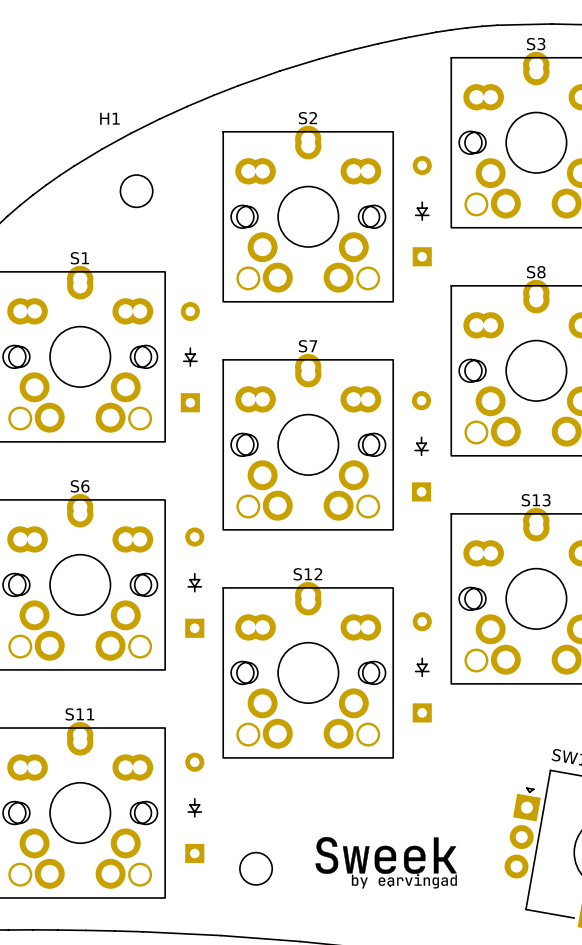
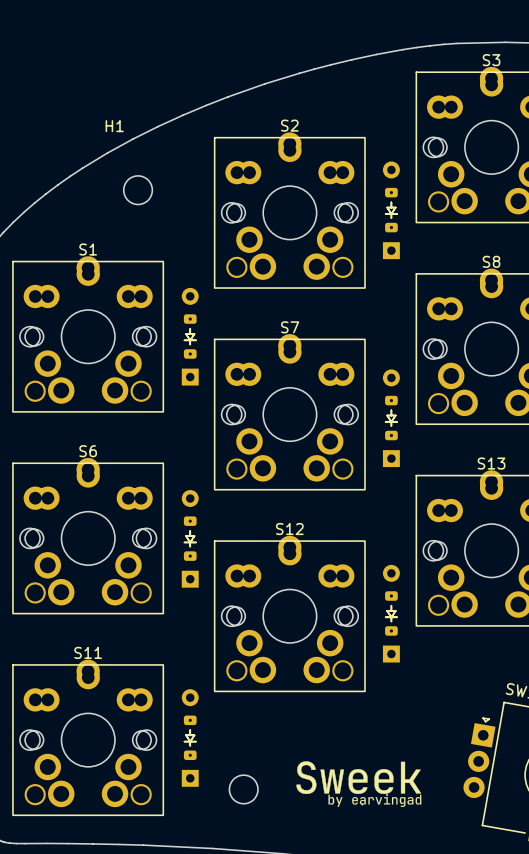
part footprint: [412, 155, 432, 267] -> [382, 161, 400, 260]
part footprint: [180, 301, 200, 413] -> [181, 287, 199, 386]
part footprint: [411, 391, 432, 502] -> [382, 369, 400, 468]
part footprint: [185, 527, 205, 638] -> [181, 490, 199, 588]
part footprint: [412, 612, 432, 723] -> [382, 564, 400, 663]
part footprint: [185, 752, 205, 864] -> [181, 689, 199, 787]

